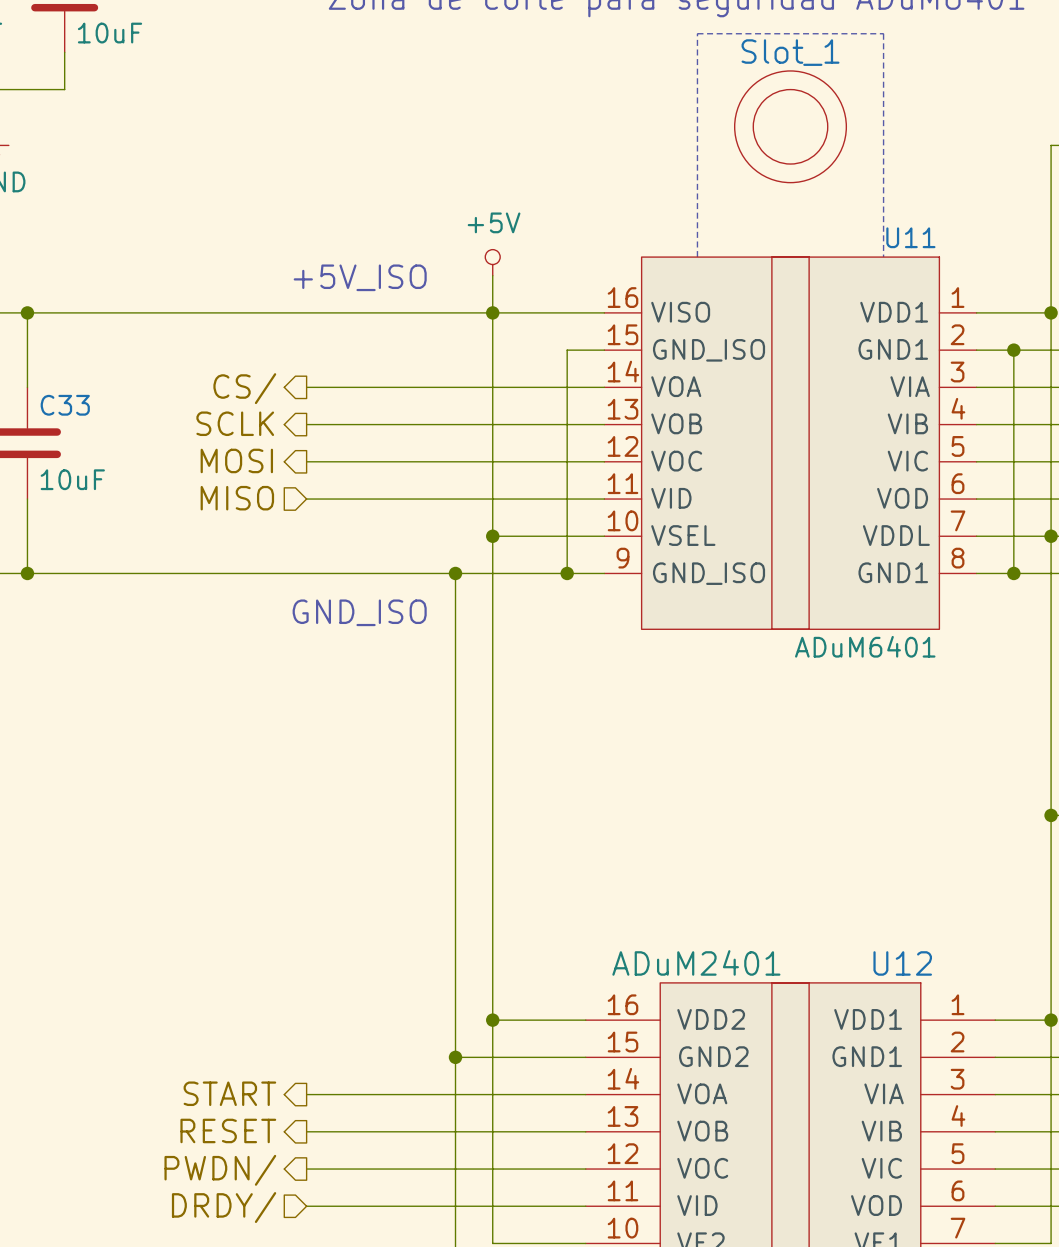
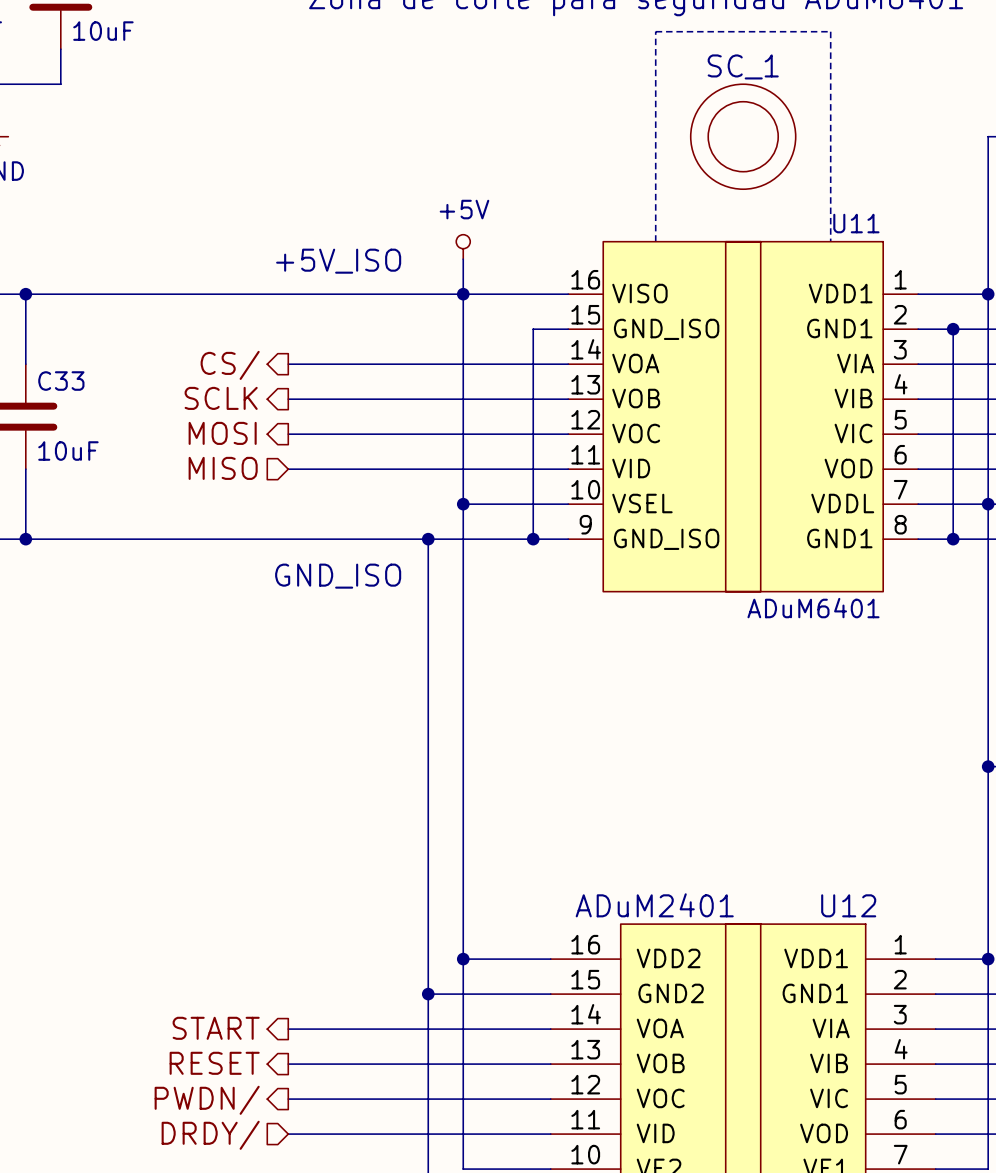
Slot_1: (790, 126) -> none
SC_1: none -> (743, 136)

